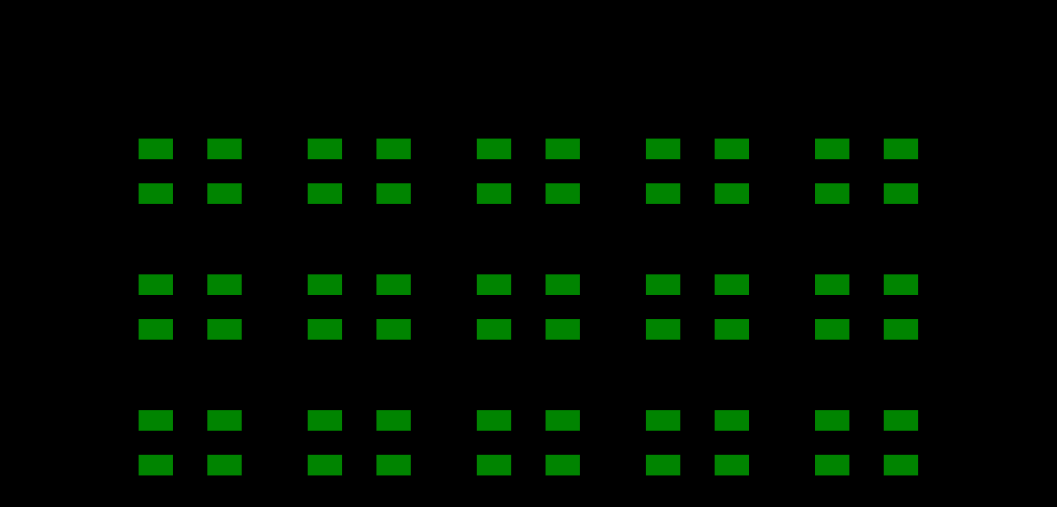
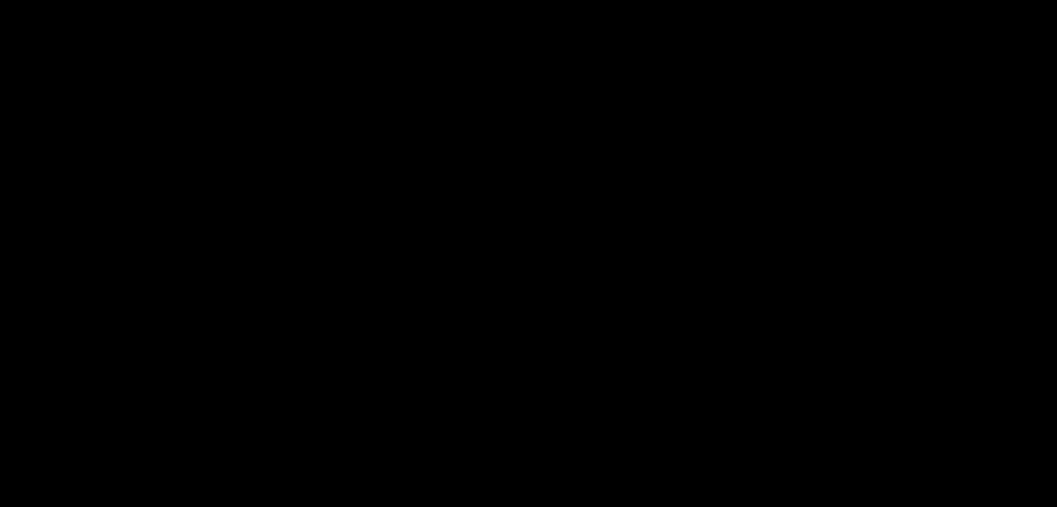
part: (190, 171) -> none
part: (359, 171) -> none
part: (528, 171) -> none
part: (697, 171) -> none
part: (866, 171) -> none
part: (190, 307) -> none
part: (359, 307) -> none
part: (528, 307) -> none
part: (697, 307) -> none
part: (866, 307) -> none
part: (190, 442) -> none
part: (359, 442) -> none
part: (528, 442) -> none
part: (697, 442) -> none
part: (866, 442) -> none

